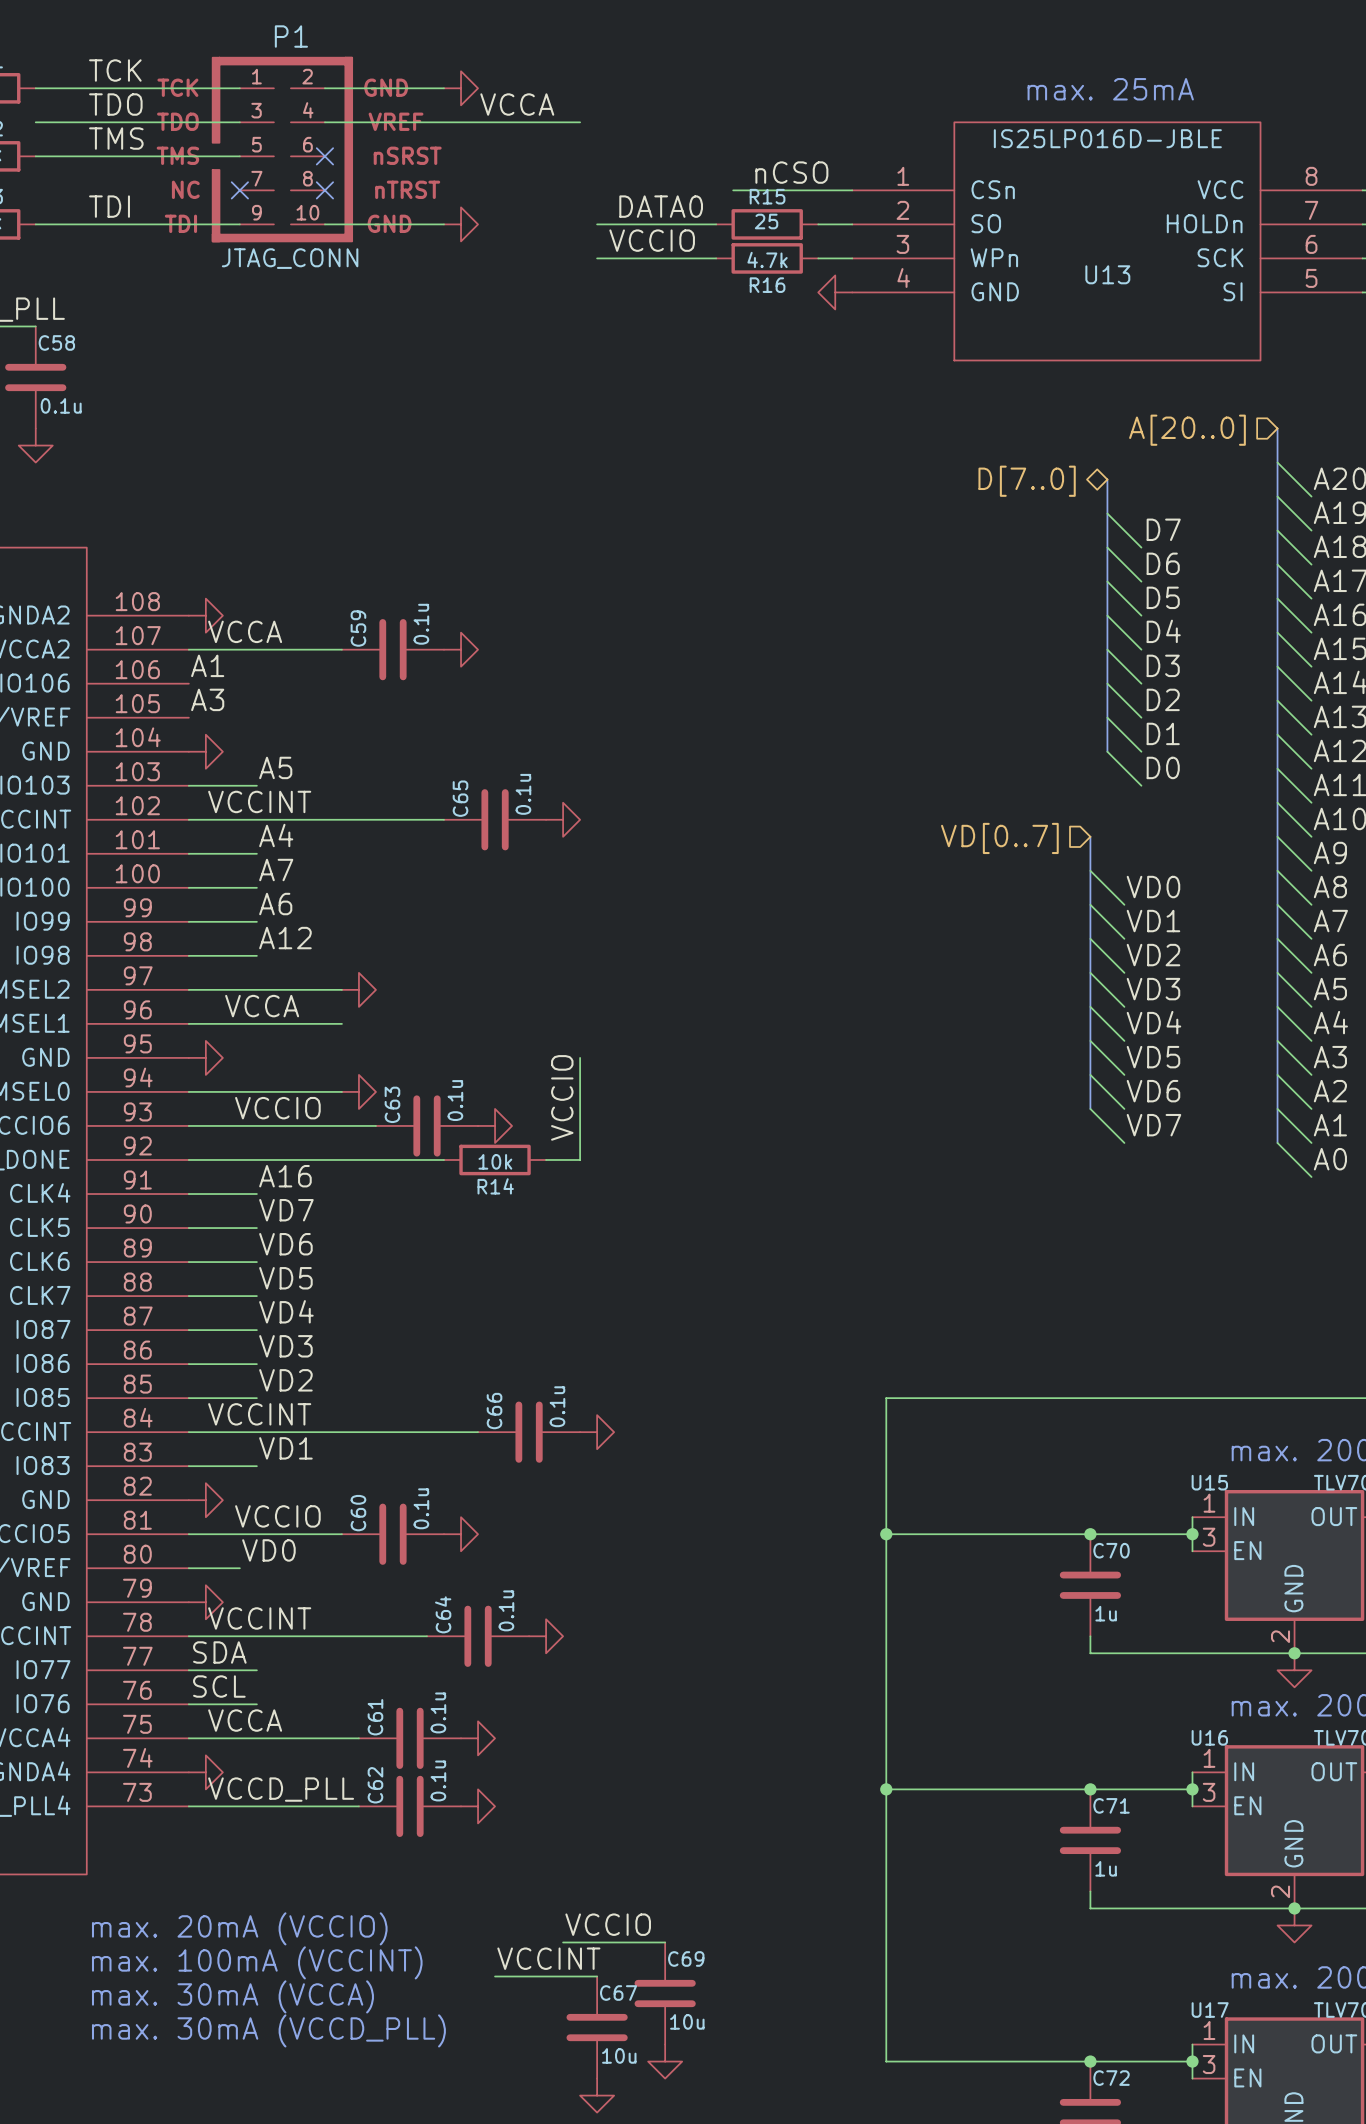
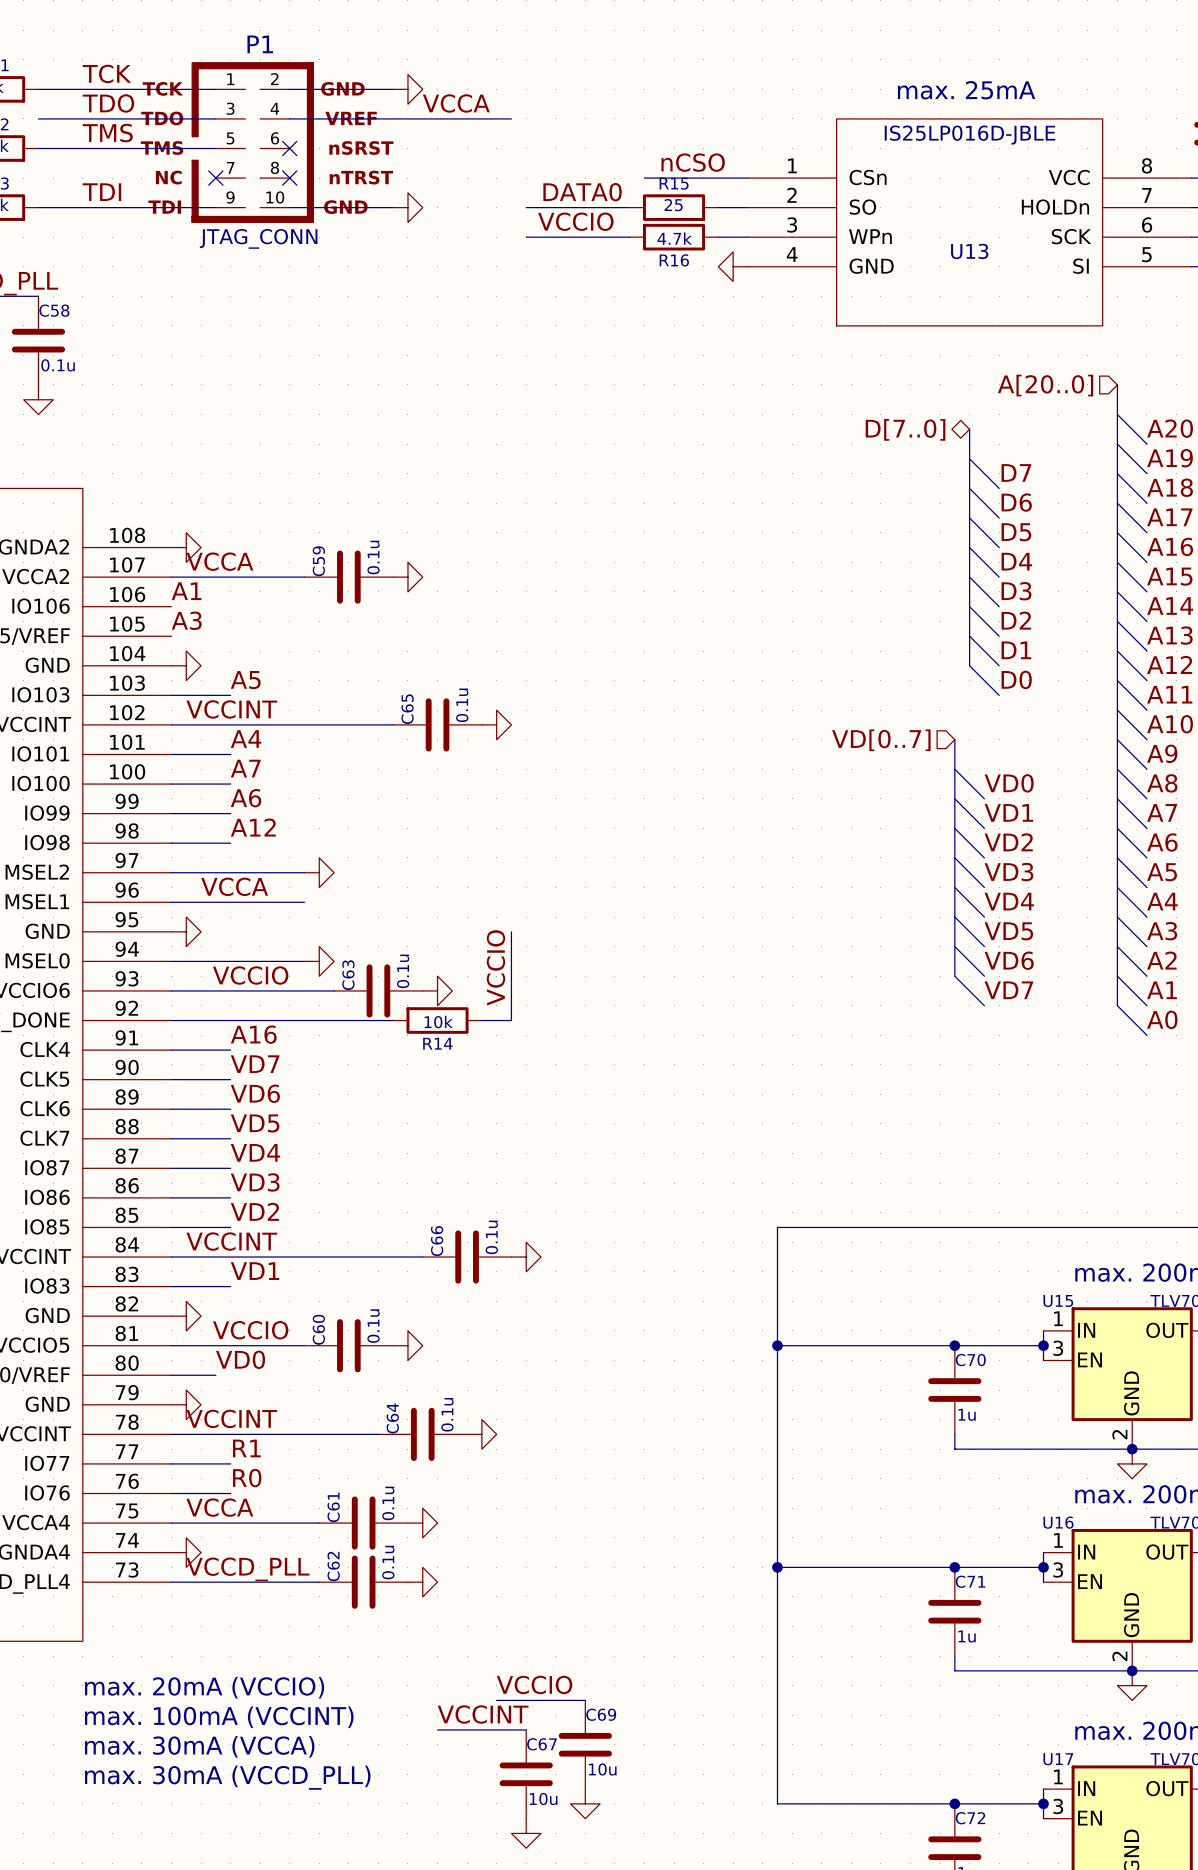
label: SDA (219, 1652) -> none
label: none -> R1 (246, 1448)
label: SCL (219, 1686) -> none
label: none -> R0 (247, 1478)

